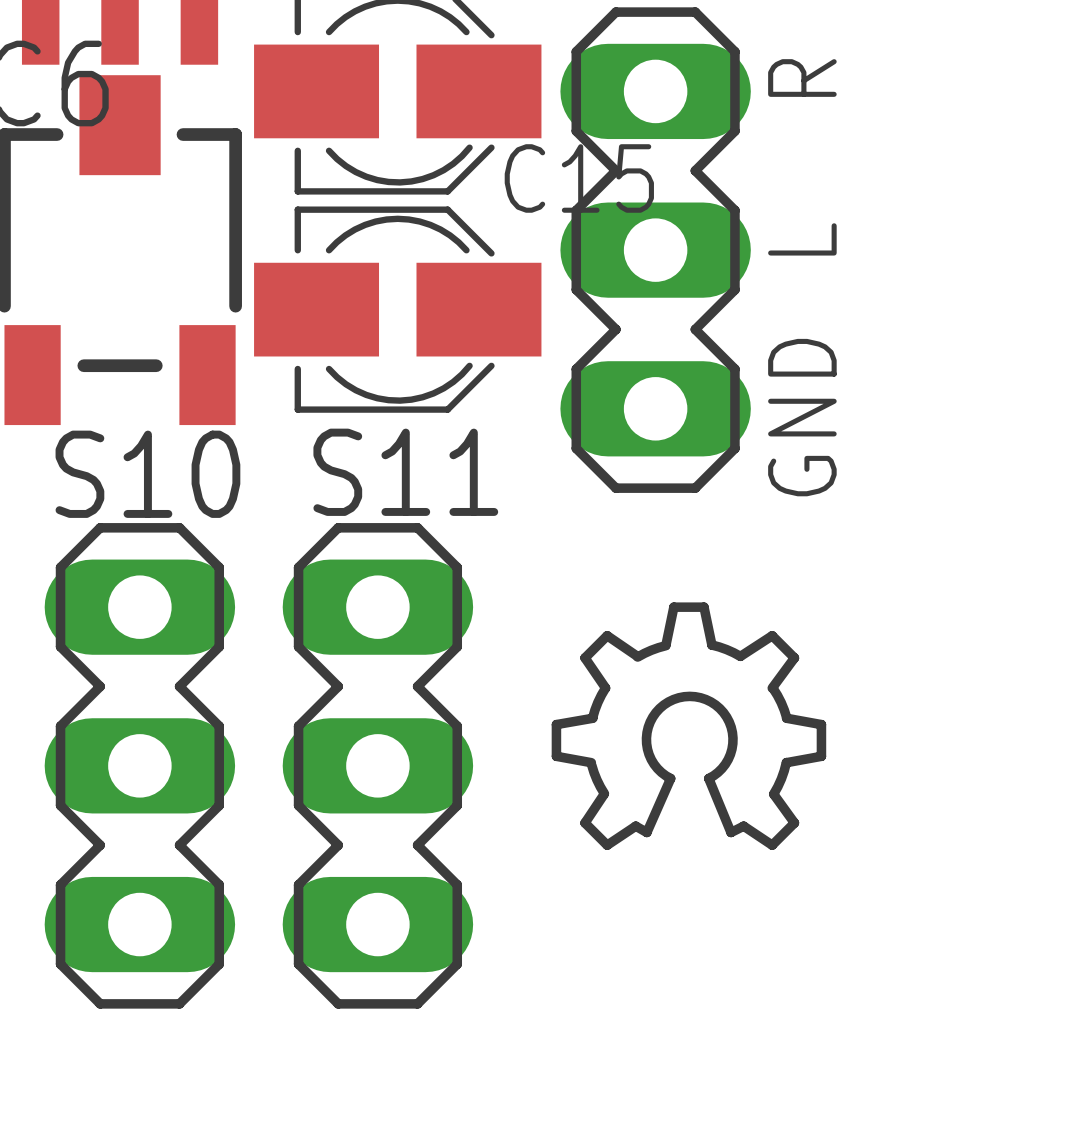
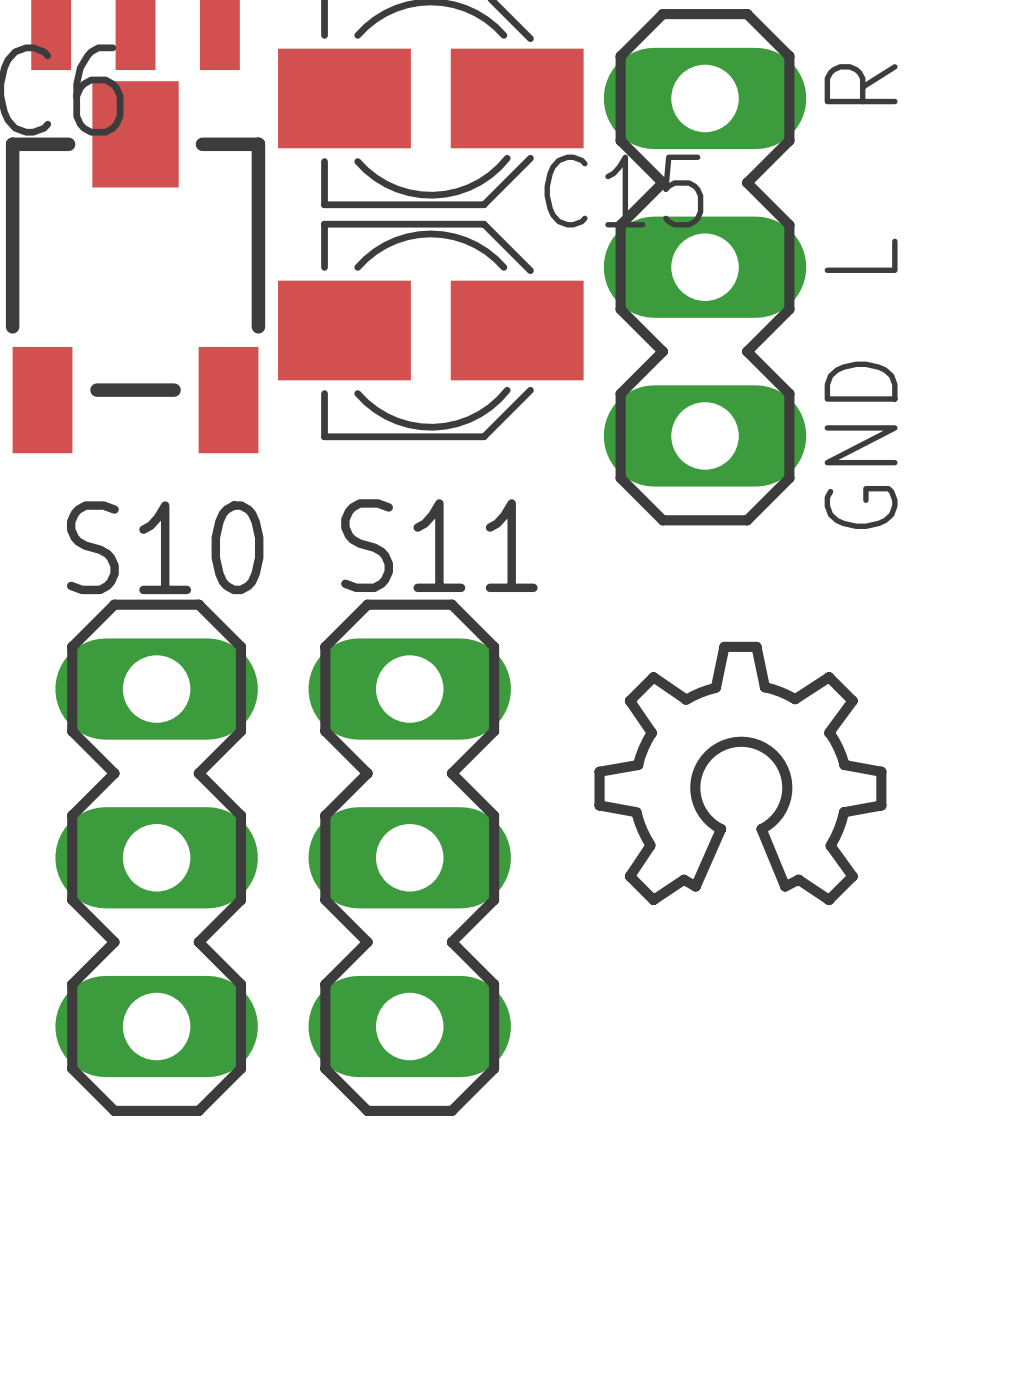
S10 position: (139, 765) -> (156, 857)
S11 position: (377, 765) -> (409, 857)

